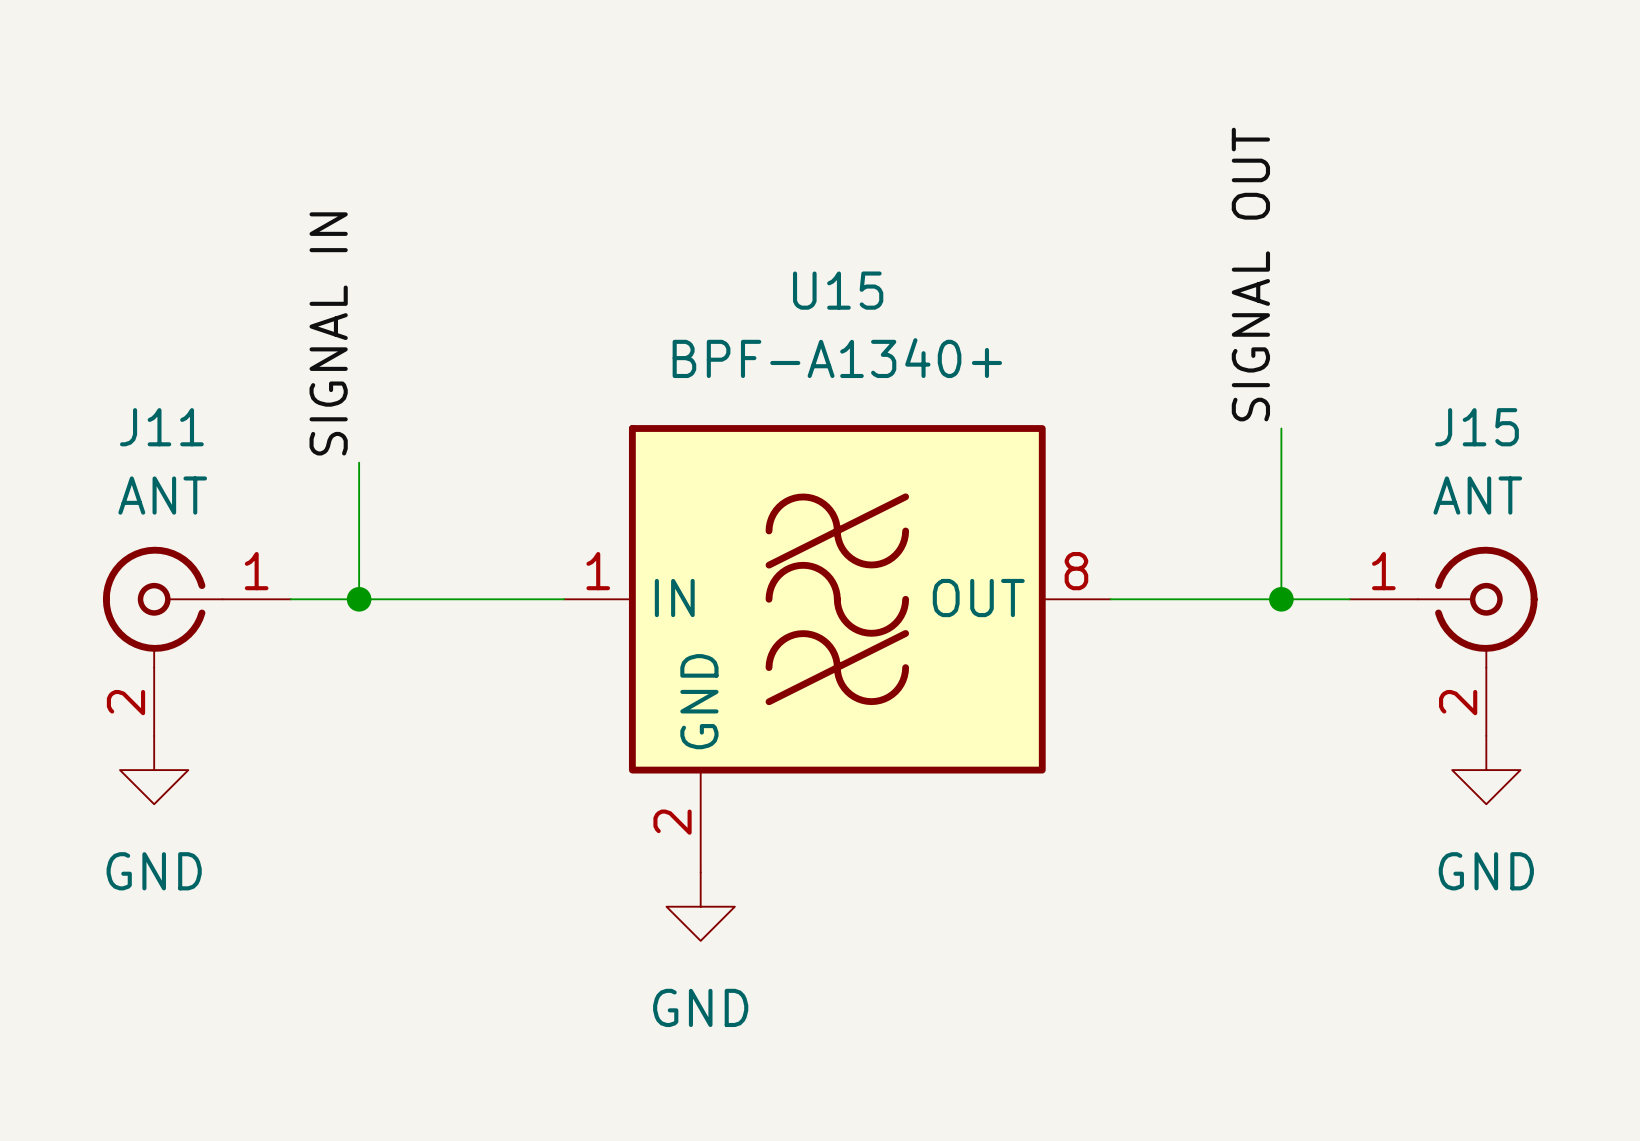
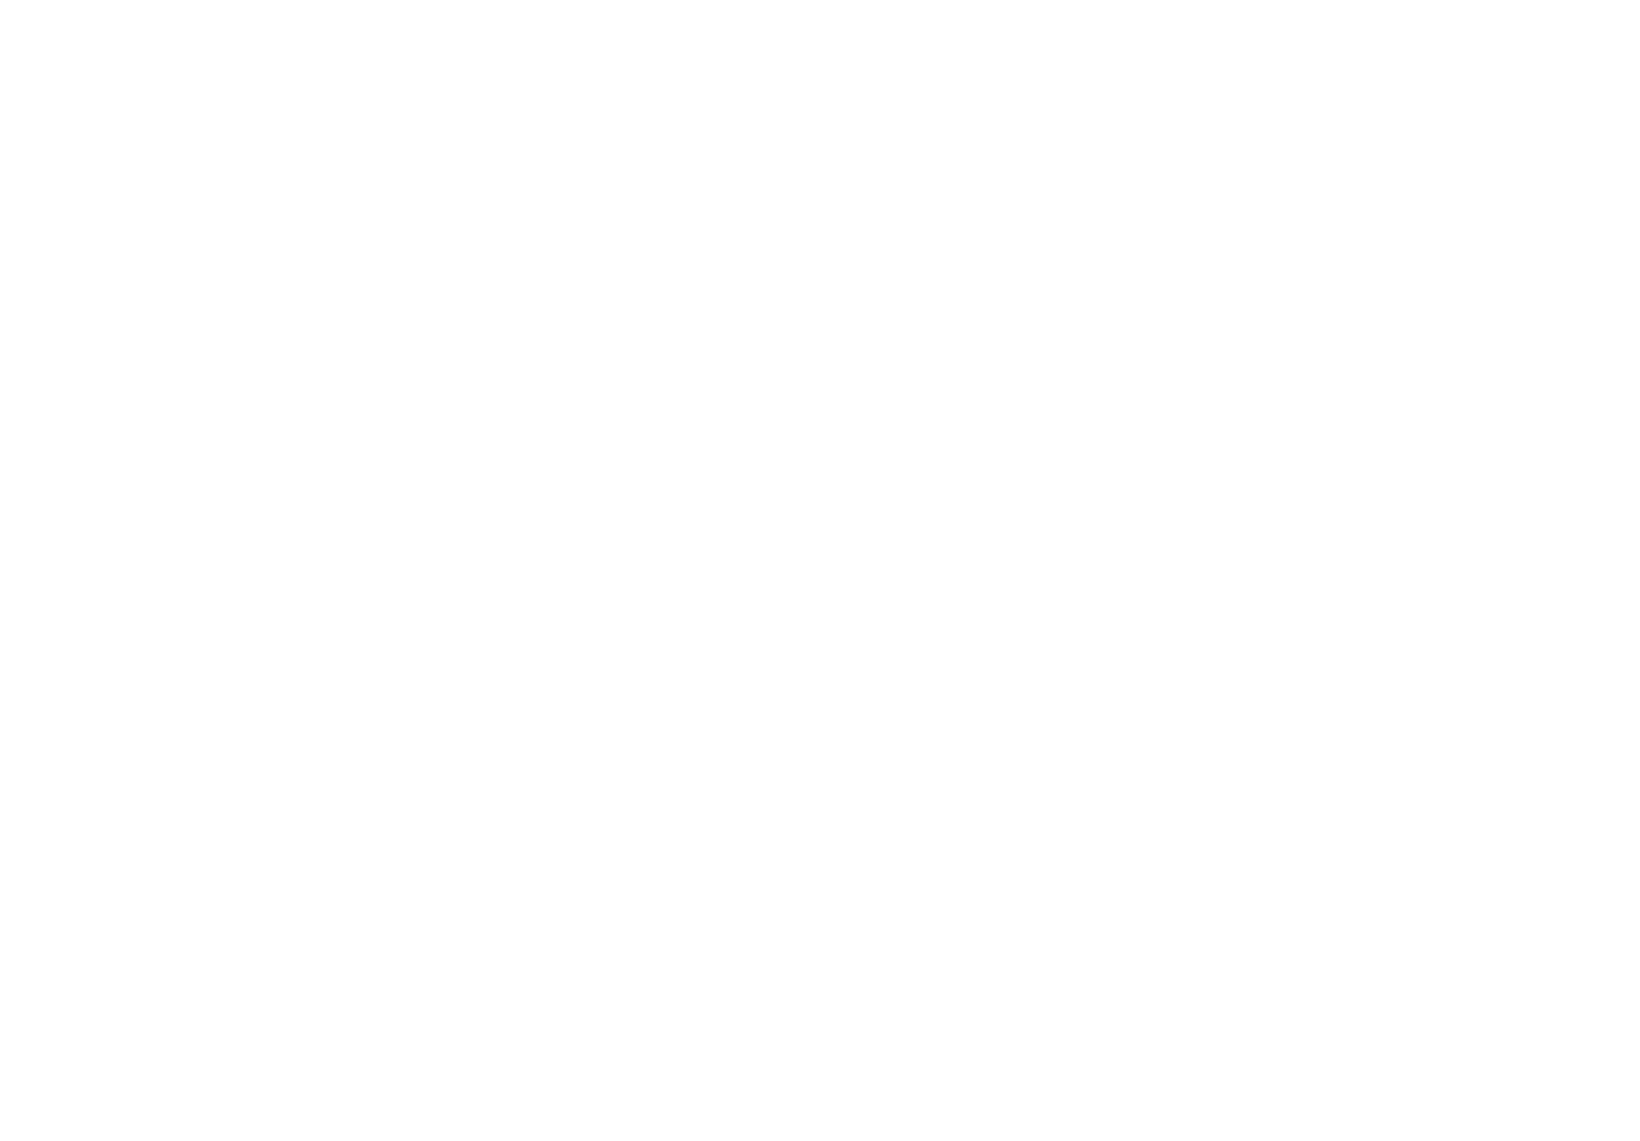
label: SIGNAL OUT (1250, 274) -> none
label: SIGNAL IN (328, 333) -> none
wire: (1281, 428) (1281, 599) -> none
wire: (359, 462) (359, 599) -> none
wire: (290, 599) (564, 599) -> none
junction: (359, 599) -> none
wire: (1110, 599) (1349, 599) -> none
junction: (1281, 599) -> none
J11: ANT (196, 641) -> none
J15: ANT (1443, 641) -> none
U15: BPF-A1340+ (837, 648) -> none
power symbol: GND (154, 770) -> none
power symbol: GND (1486, 770) -> none
power symbol: GND (700, 906) -> none

